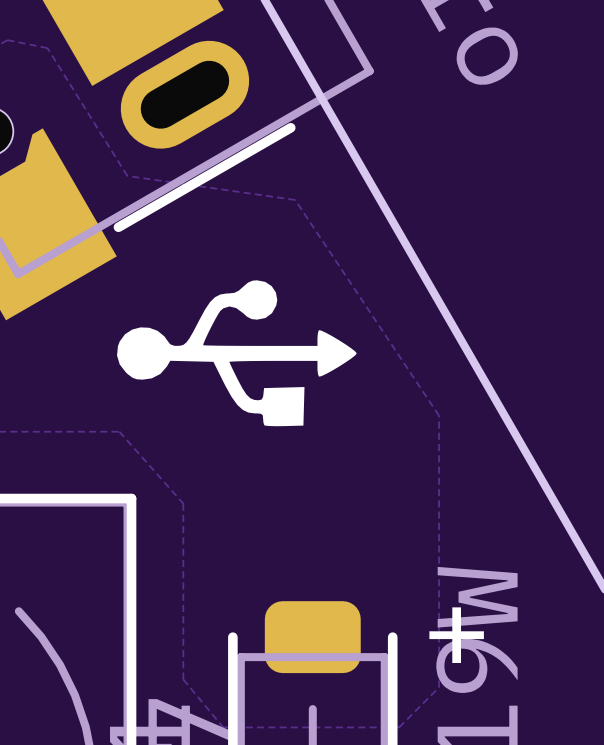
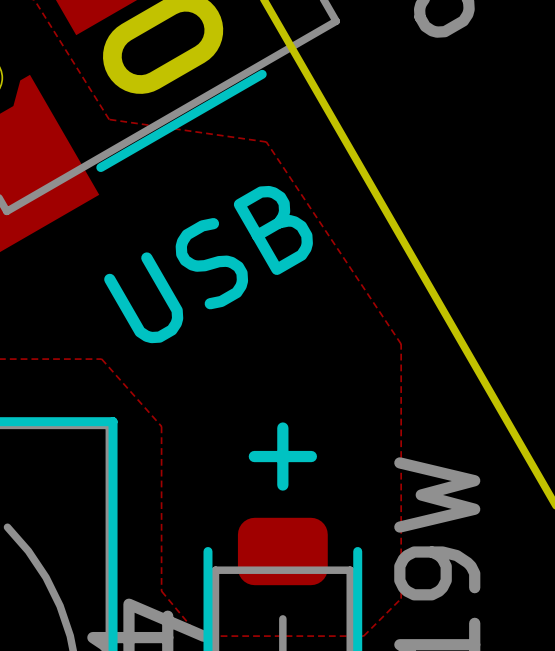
drawing: [117, 280, 357, 427] -> none
text: none -> USB (208, 264)
text position: + (456, 635) -> + (282, 456)

